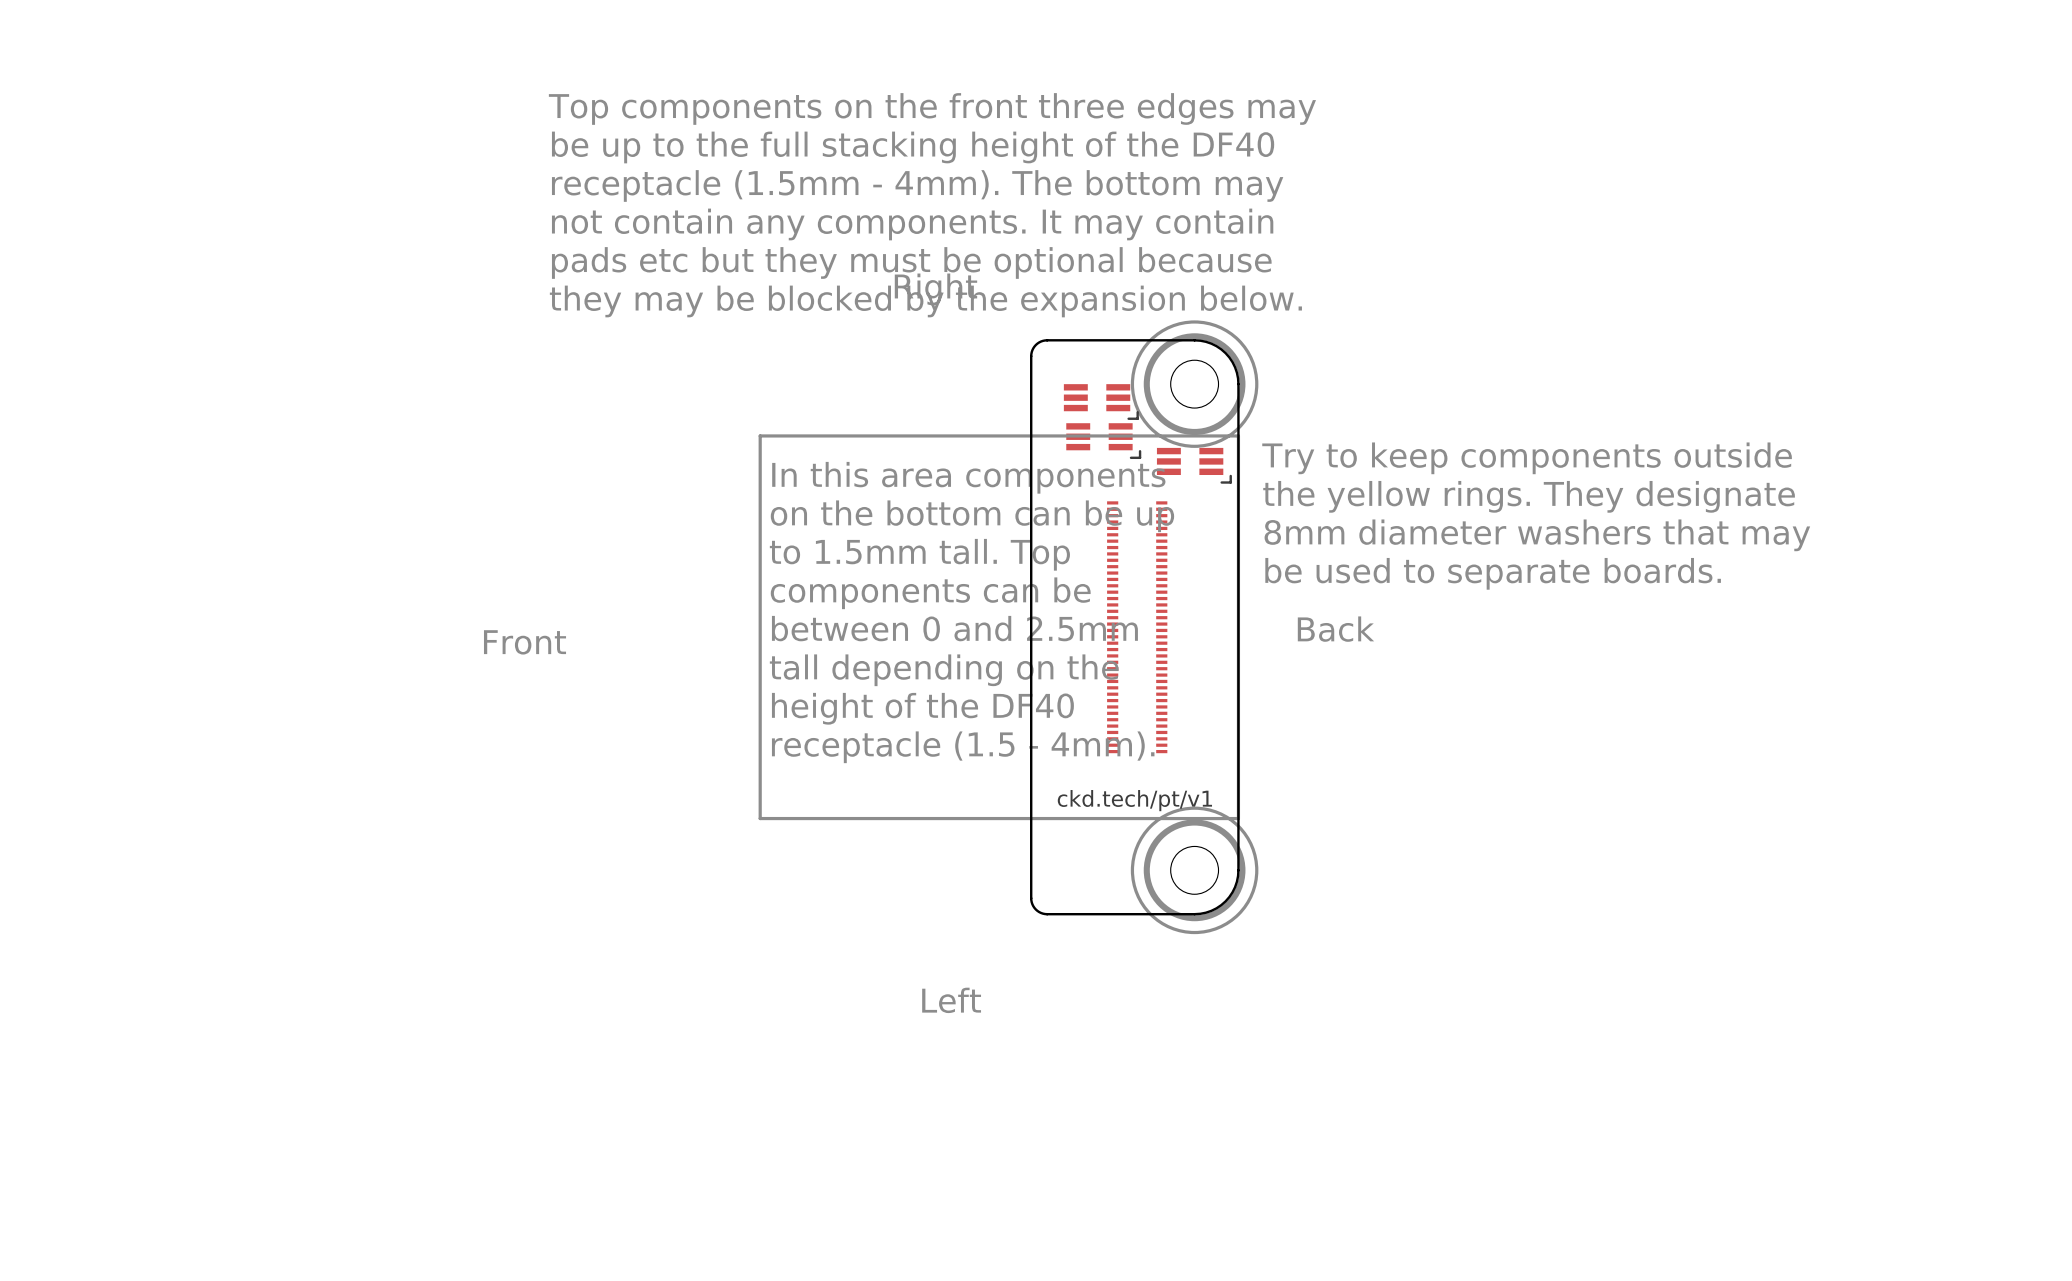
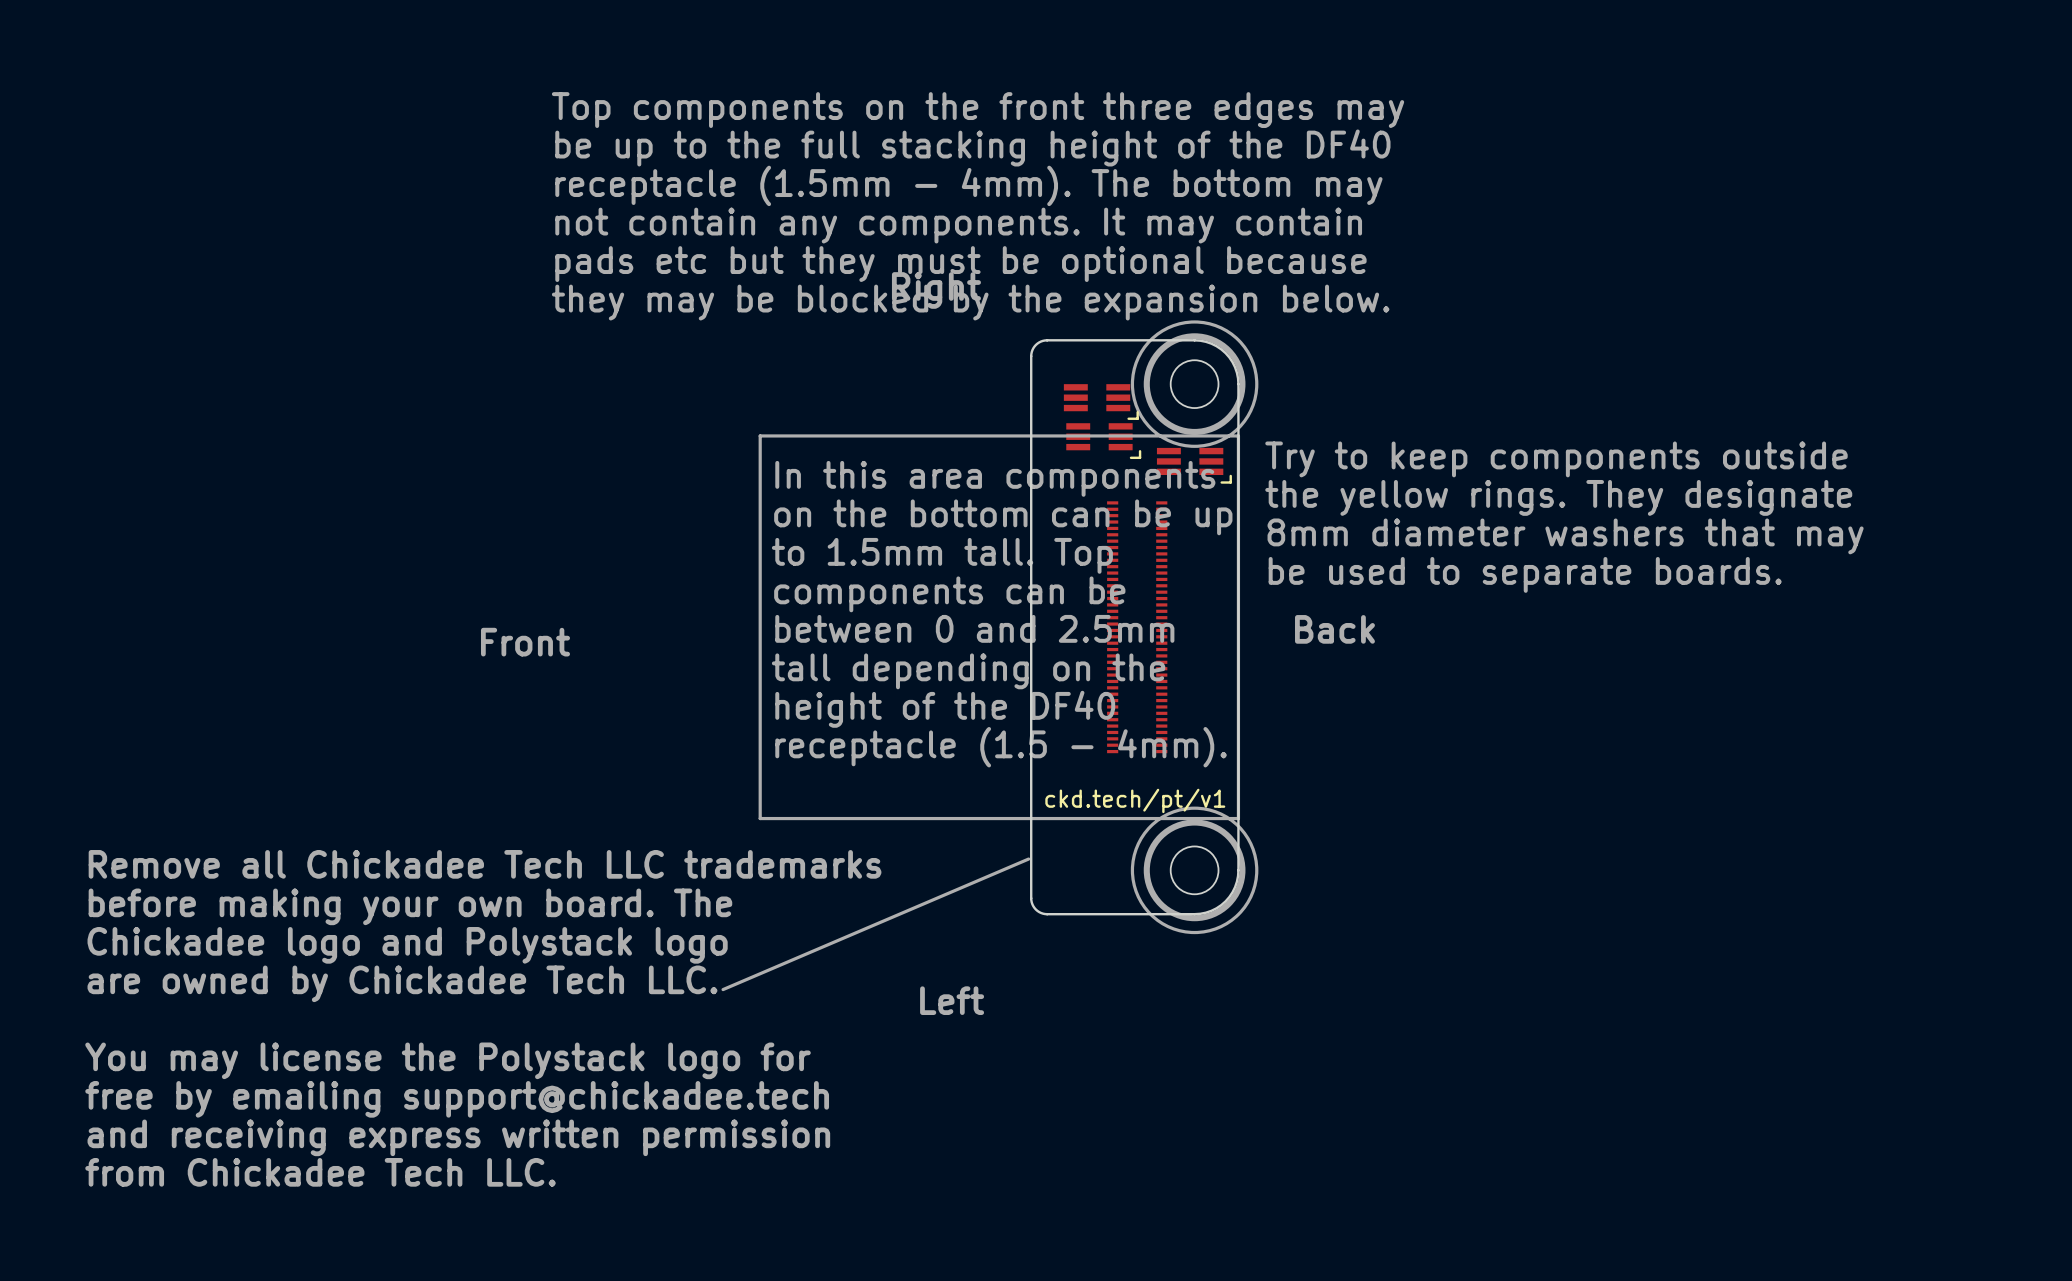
line: none -> (1028, 859) (723, 989)
text: none -> Remove all Chickadee Tech LLC trademarks (485, 864)
text: none -> before making your own board. The (410, 906)
text: none -> Chickadee logo and Polystack logo (407, 945)
text: none -> are owned by Chickadee Tech LLC. (402, 983)
text: none -> You may license the Polystack logo for (448, 1060)
text: none -> free by emailing support@chickadee.tech (457, 1099)
text: none -> and receiving express written permission (458, 1137)
text: none -> from Chickadee Tech LLC. (320, 1172)

